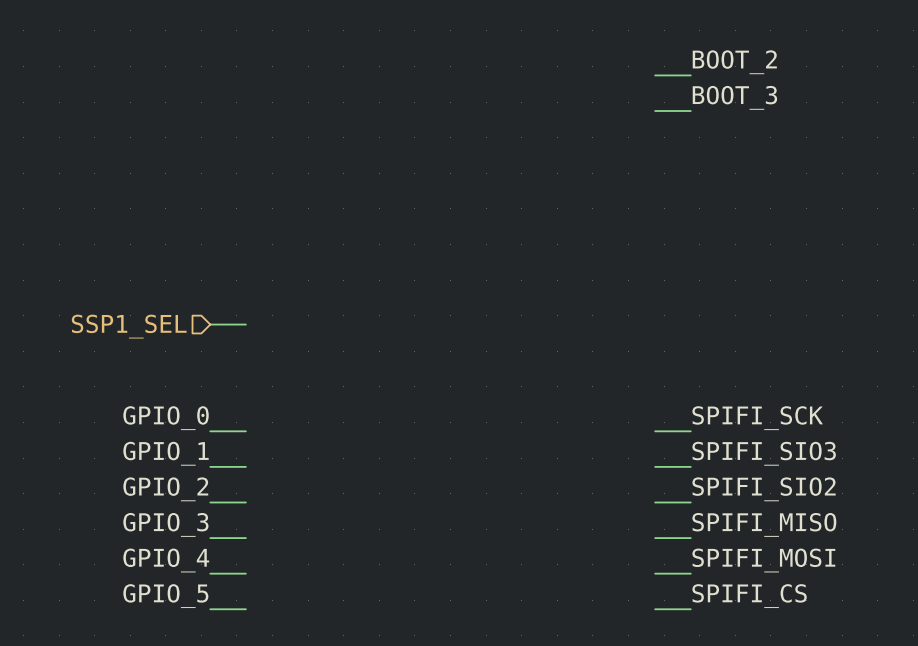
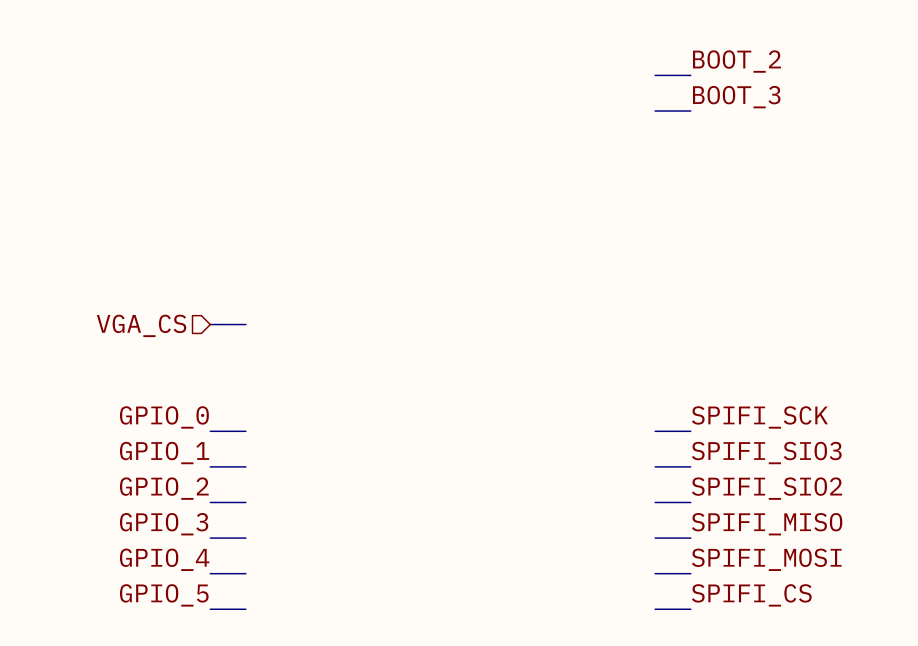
hierarchical label: SSP1_SEL (129, 326) -> VGA_CS (141, 325)

